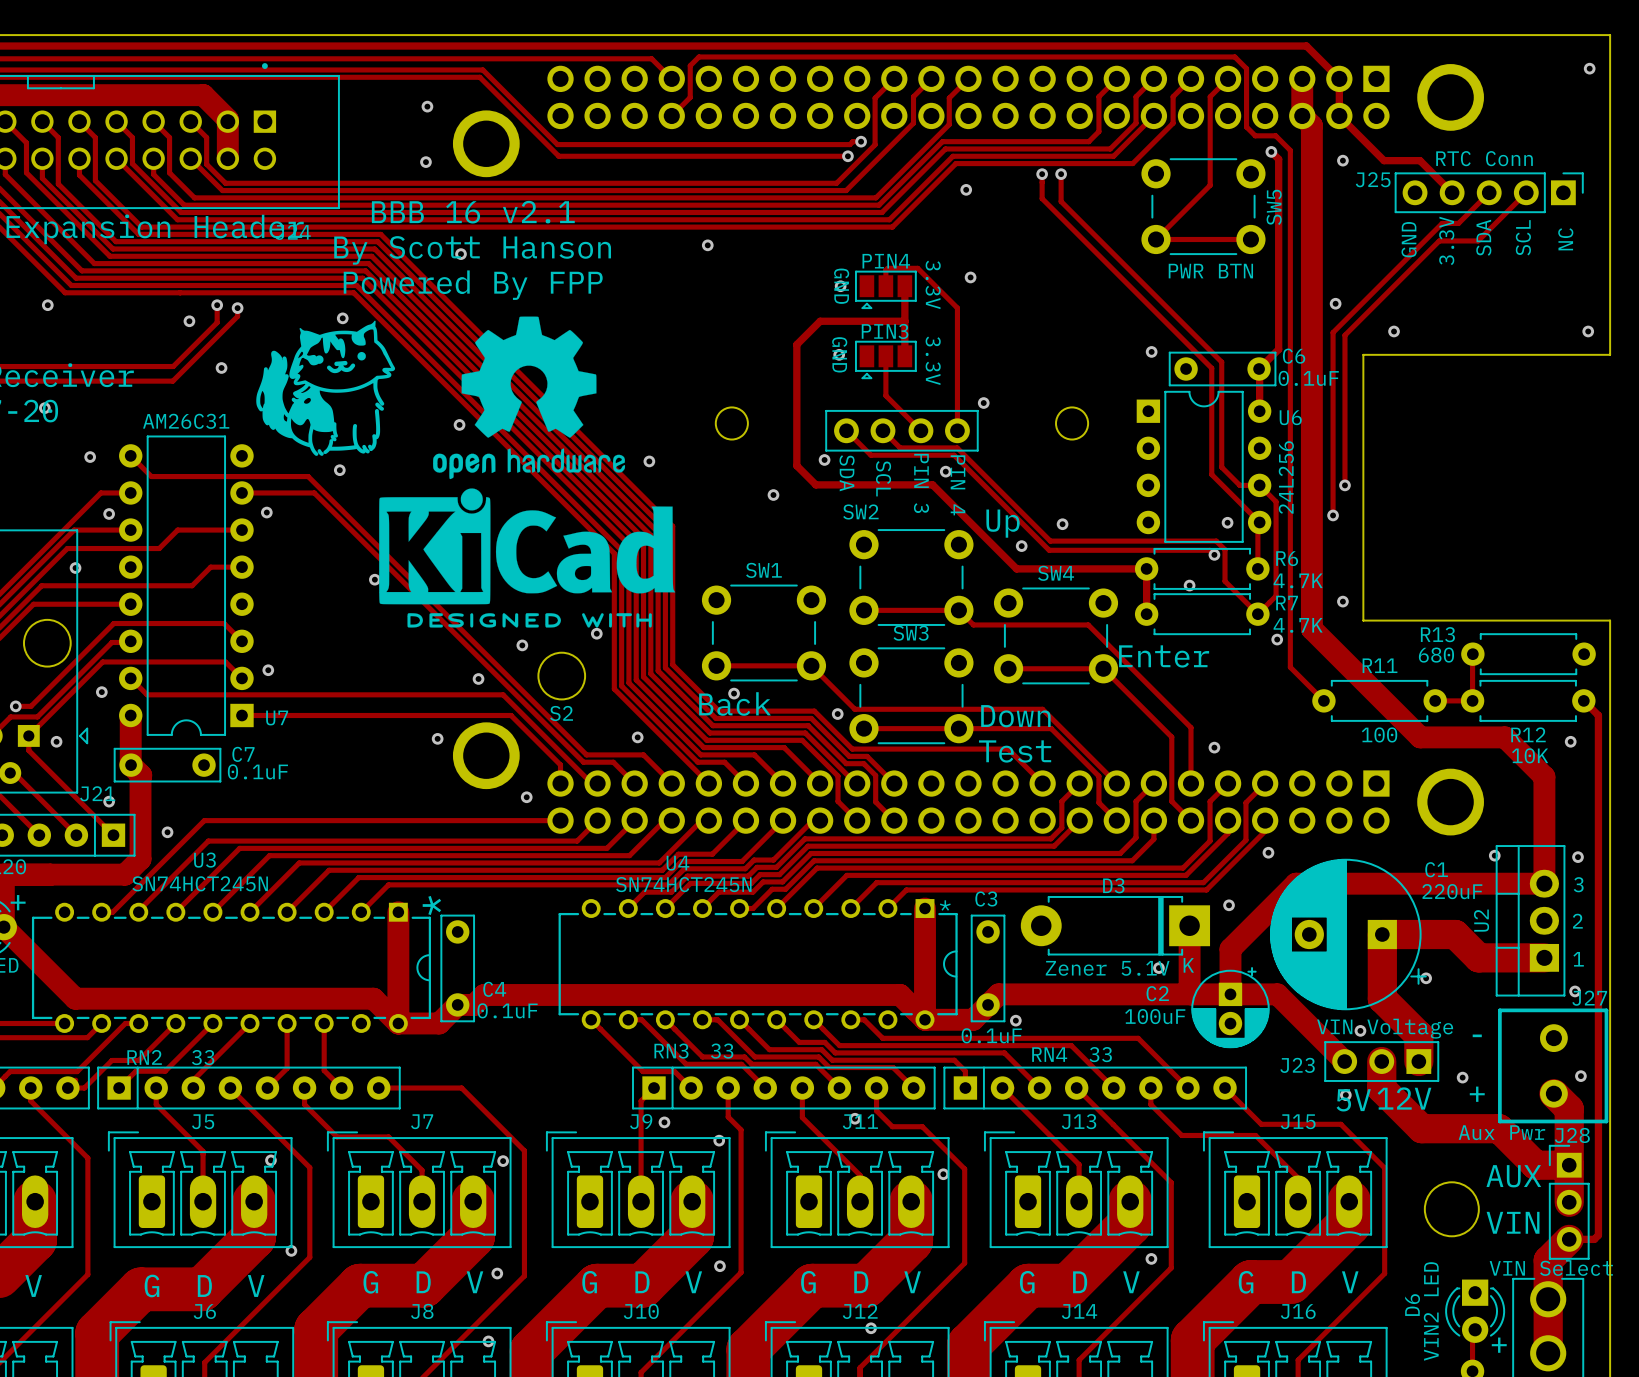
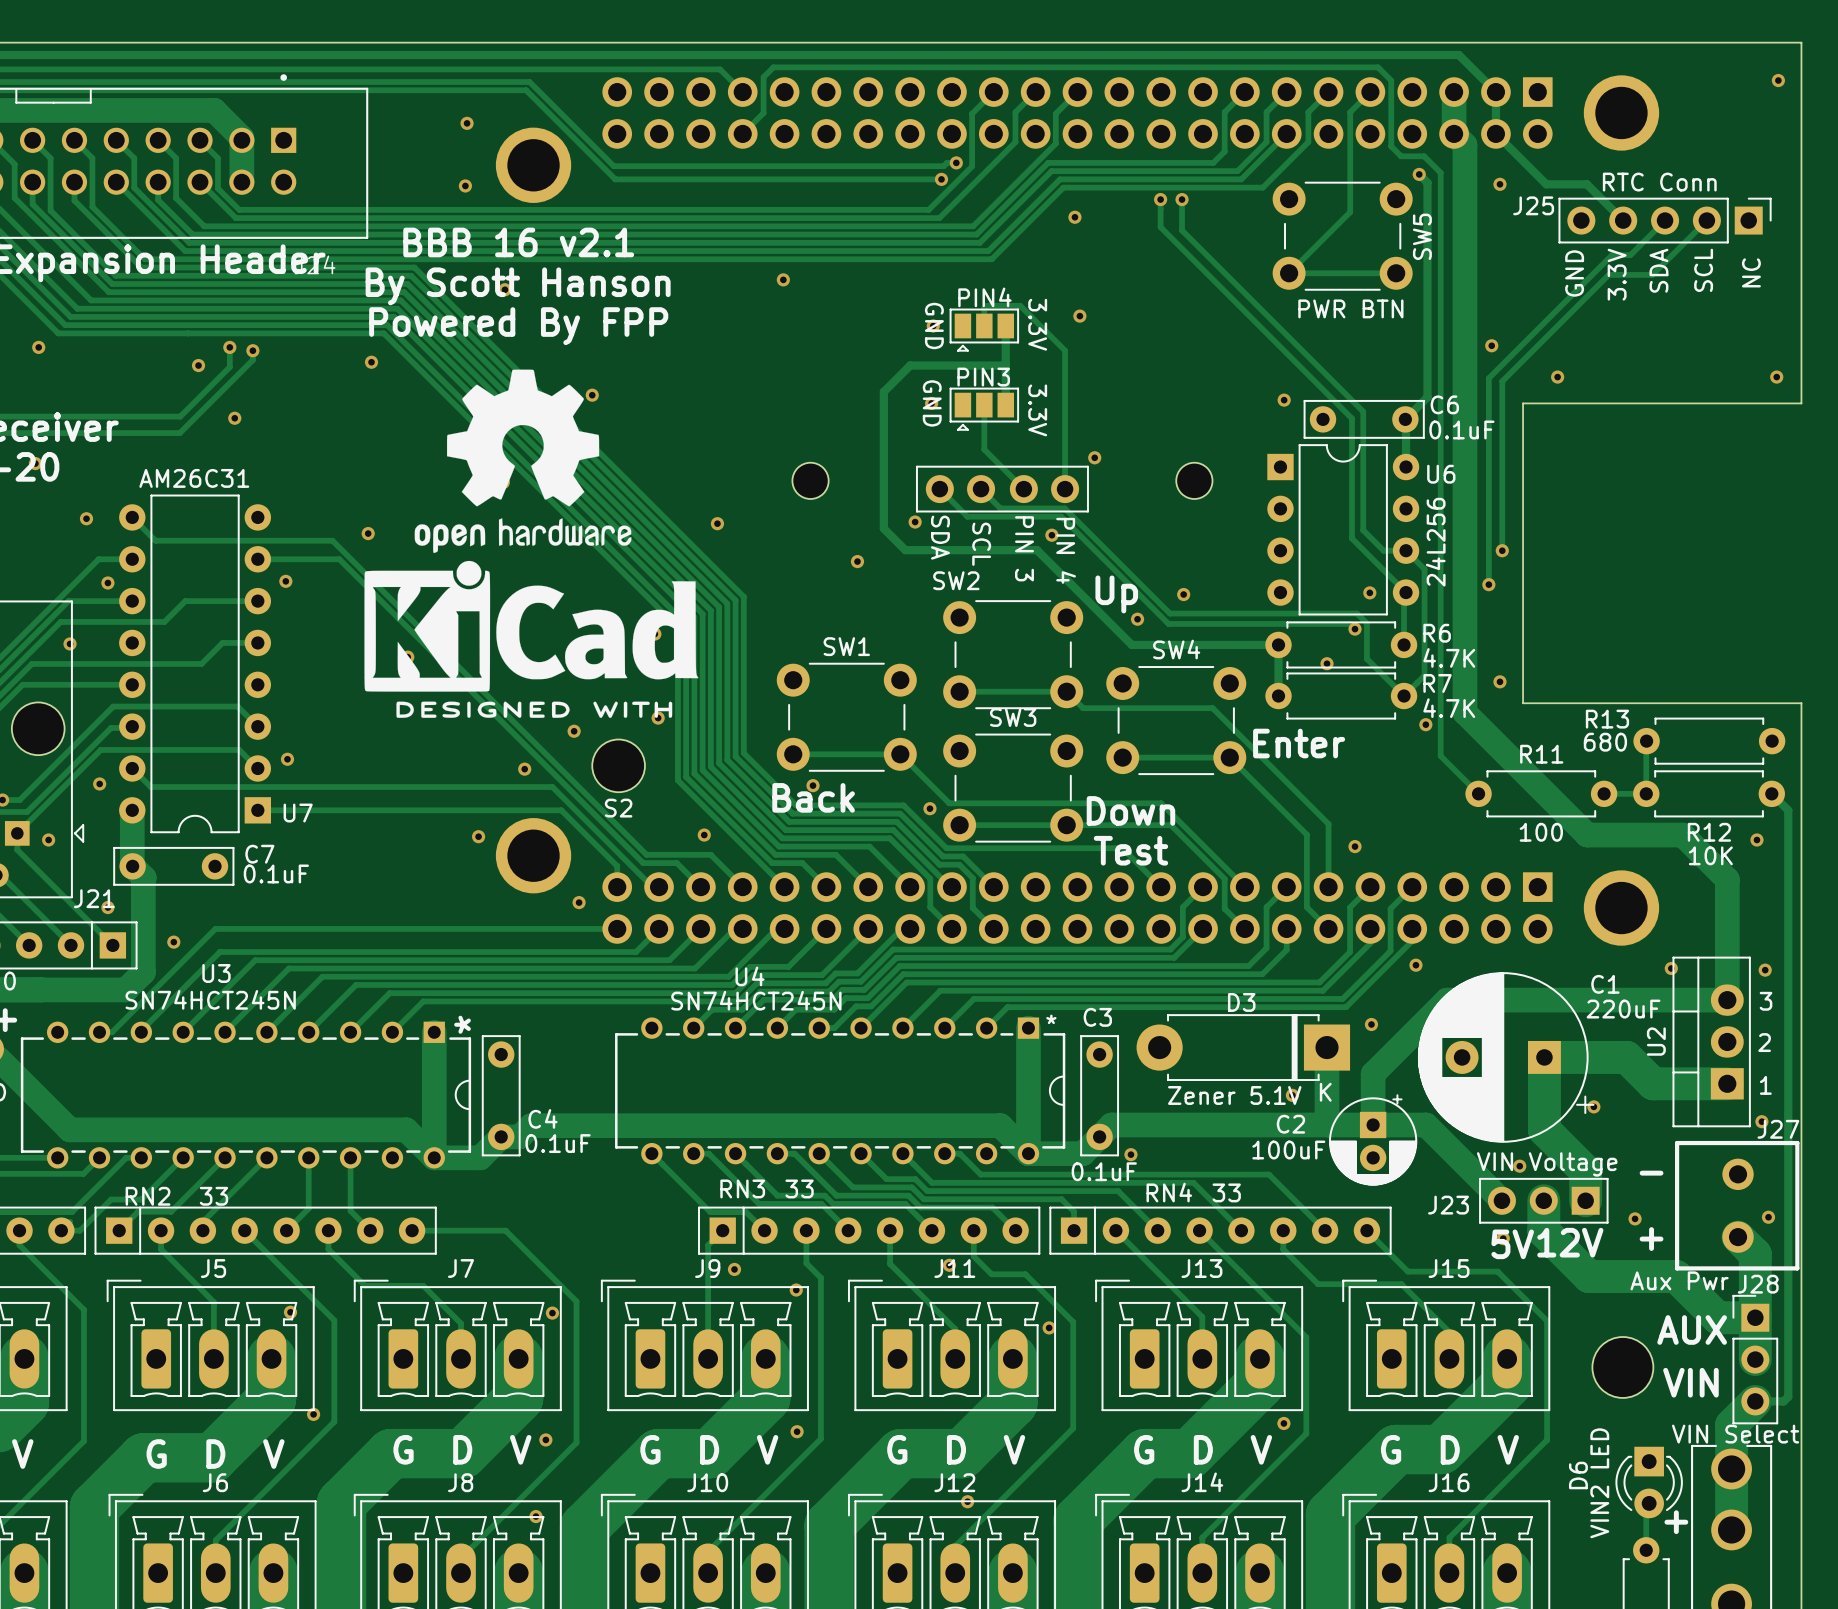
drawing: [256, 320, 396, 456] -> none
drawing position: (529, 397) -> (523, 461)
drawing position: (527, 558) -> (531, 639)

